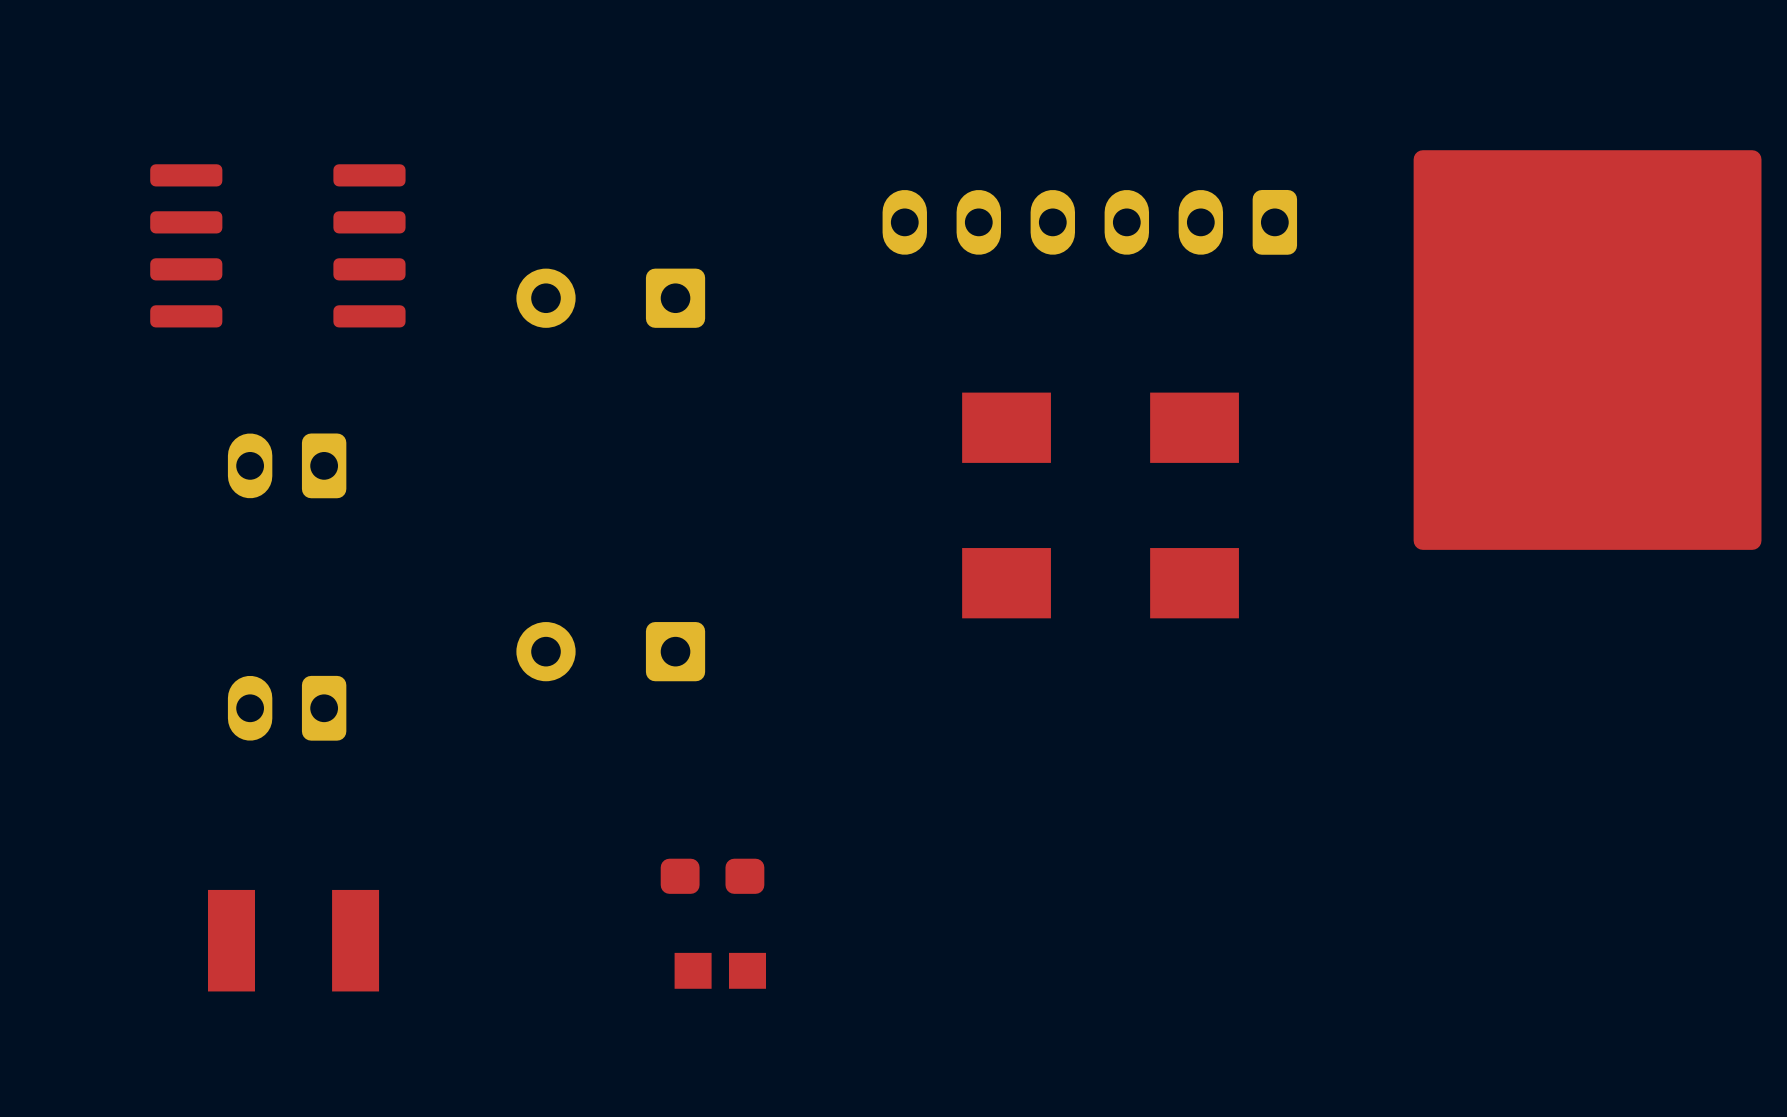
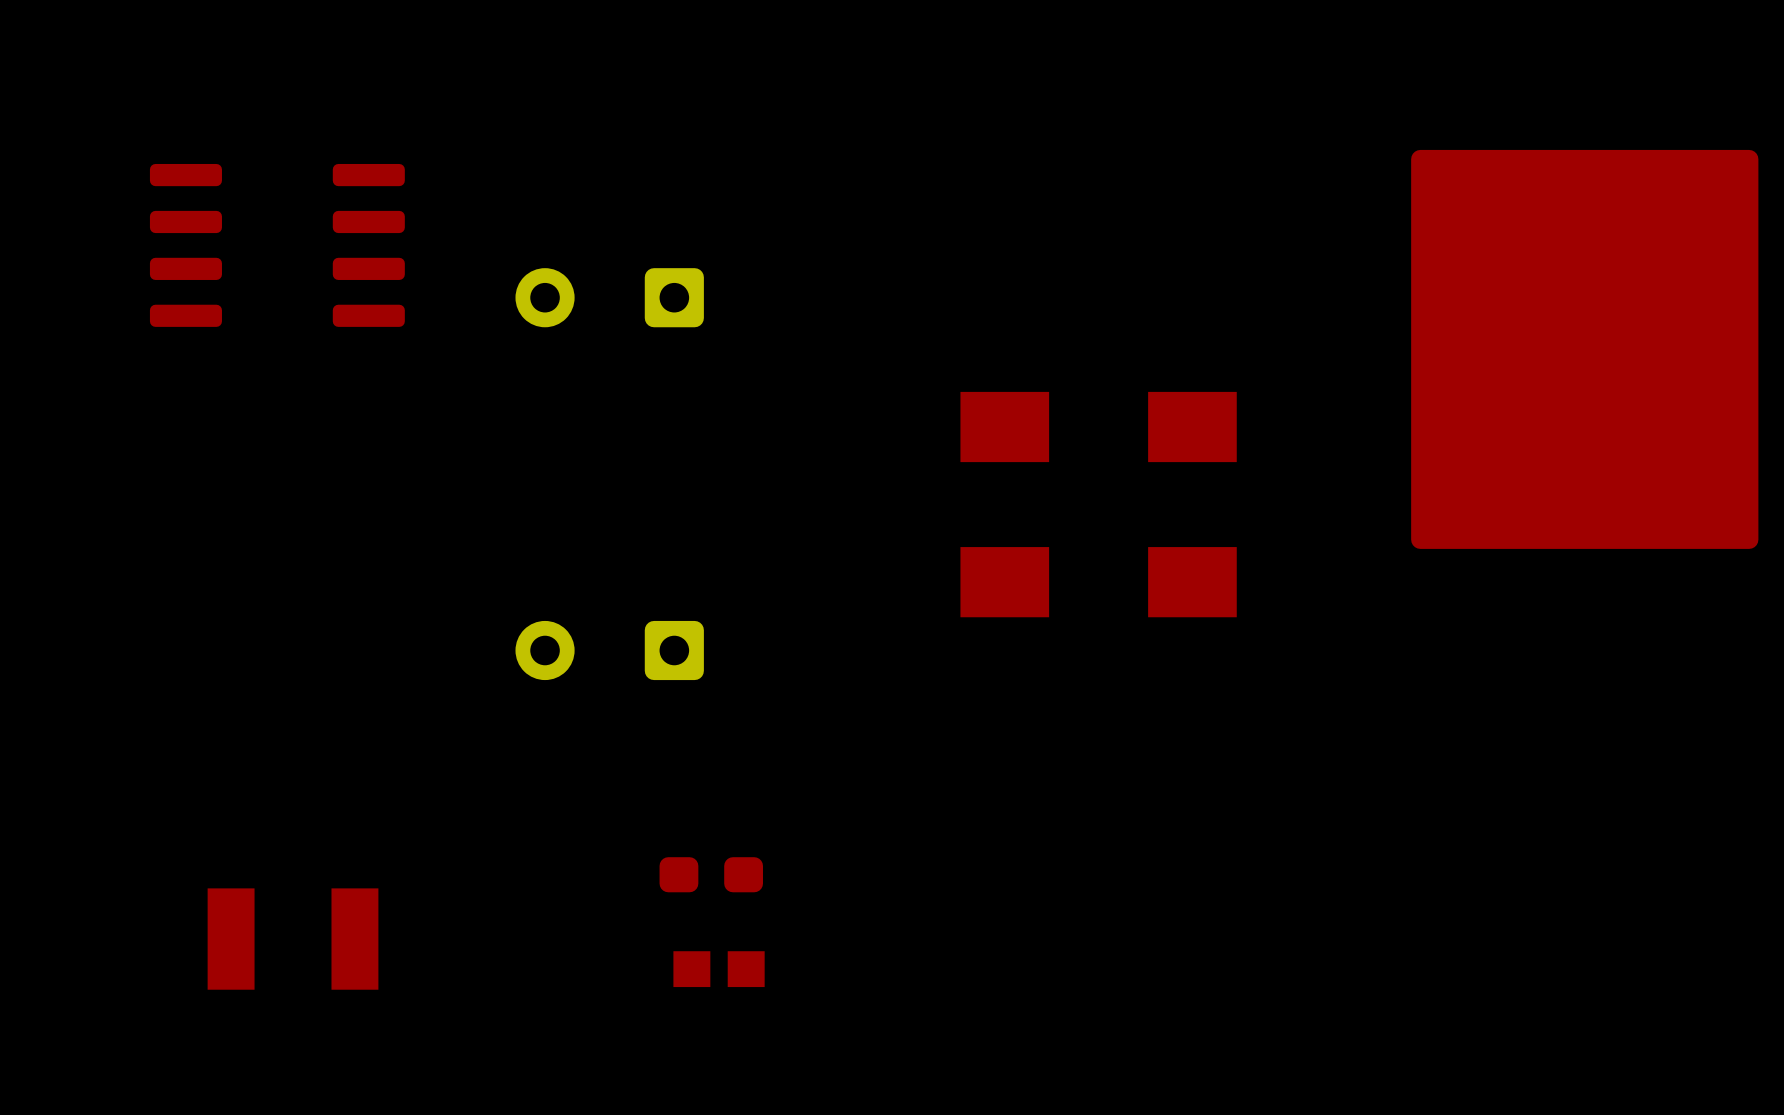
part: (1089, 222) -> none
part: (287, 465) -> none
part: (287, 708) -> none

